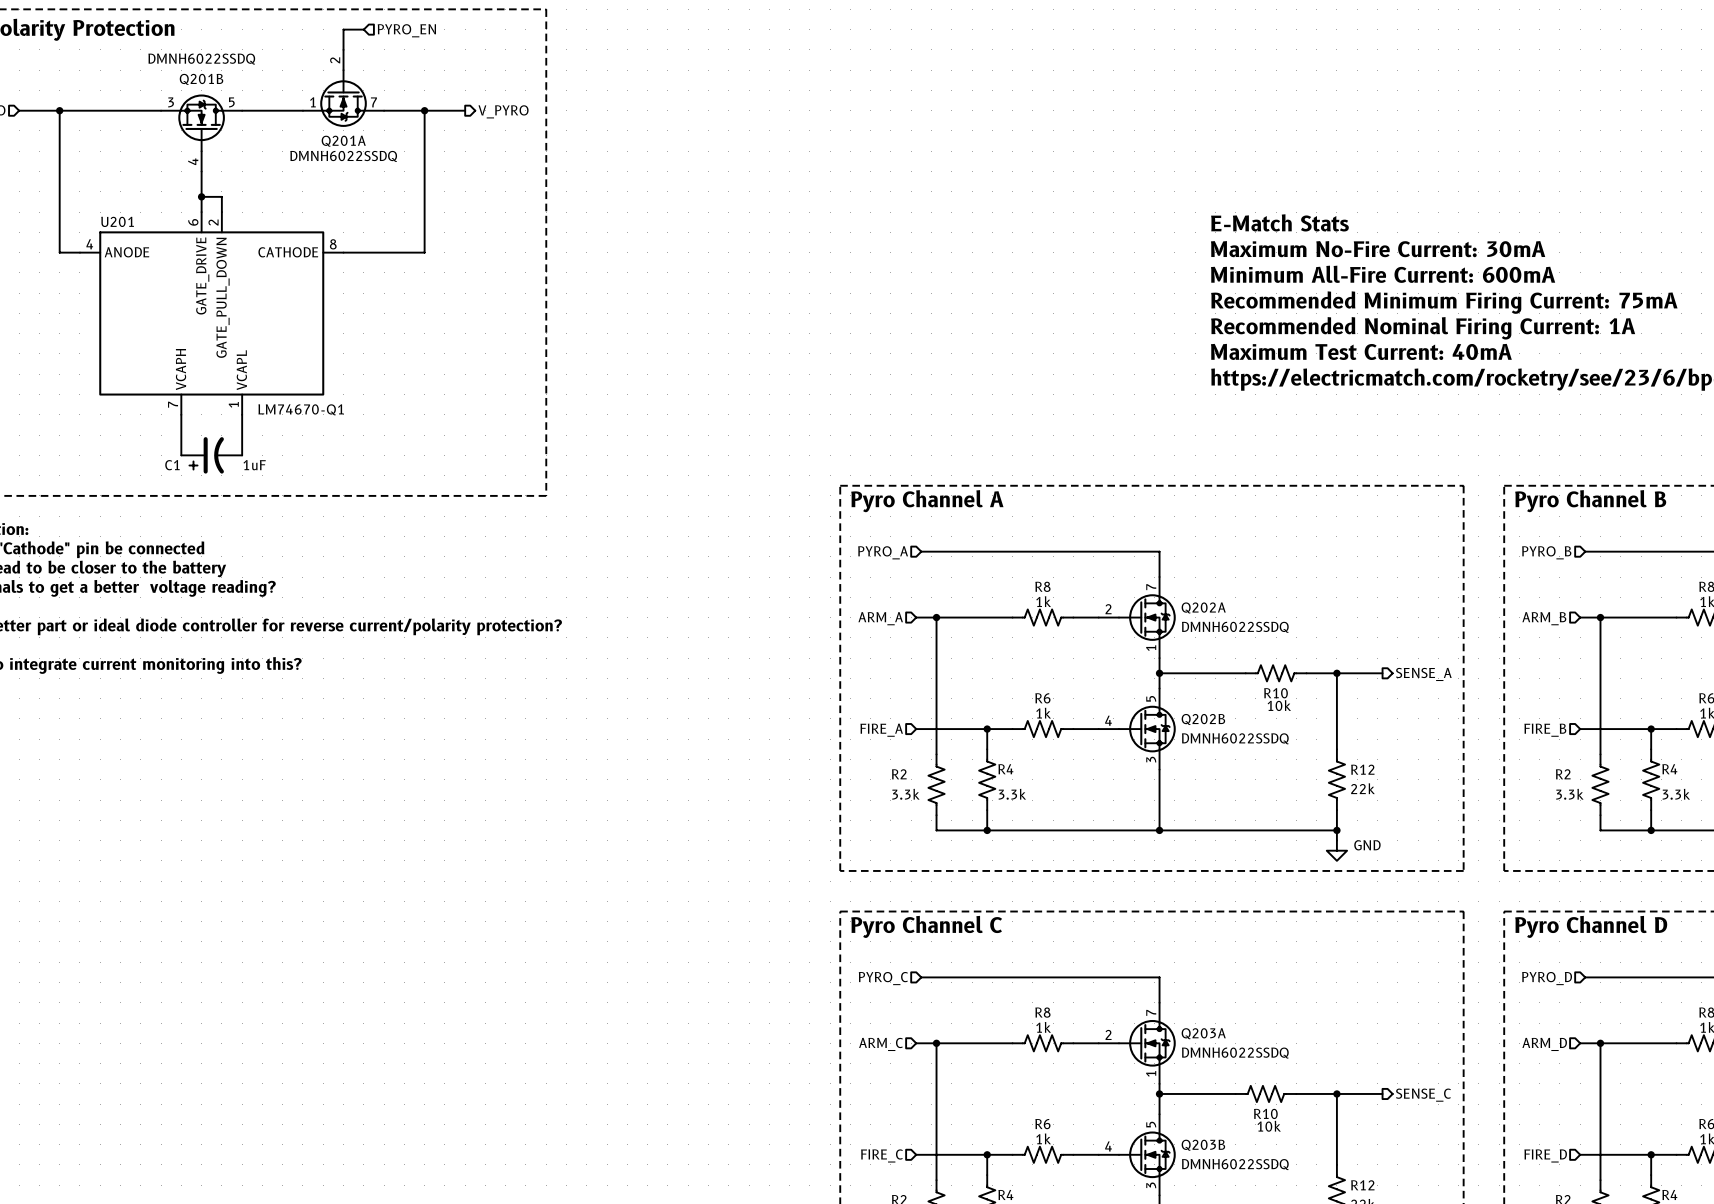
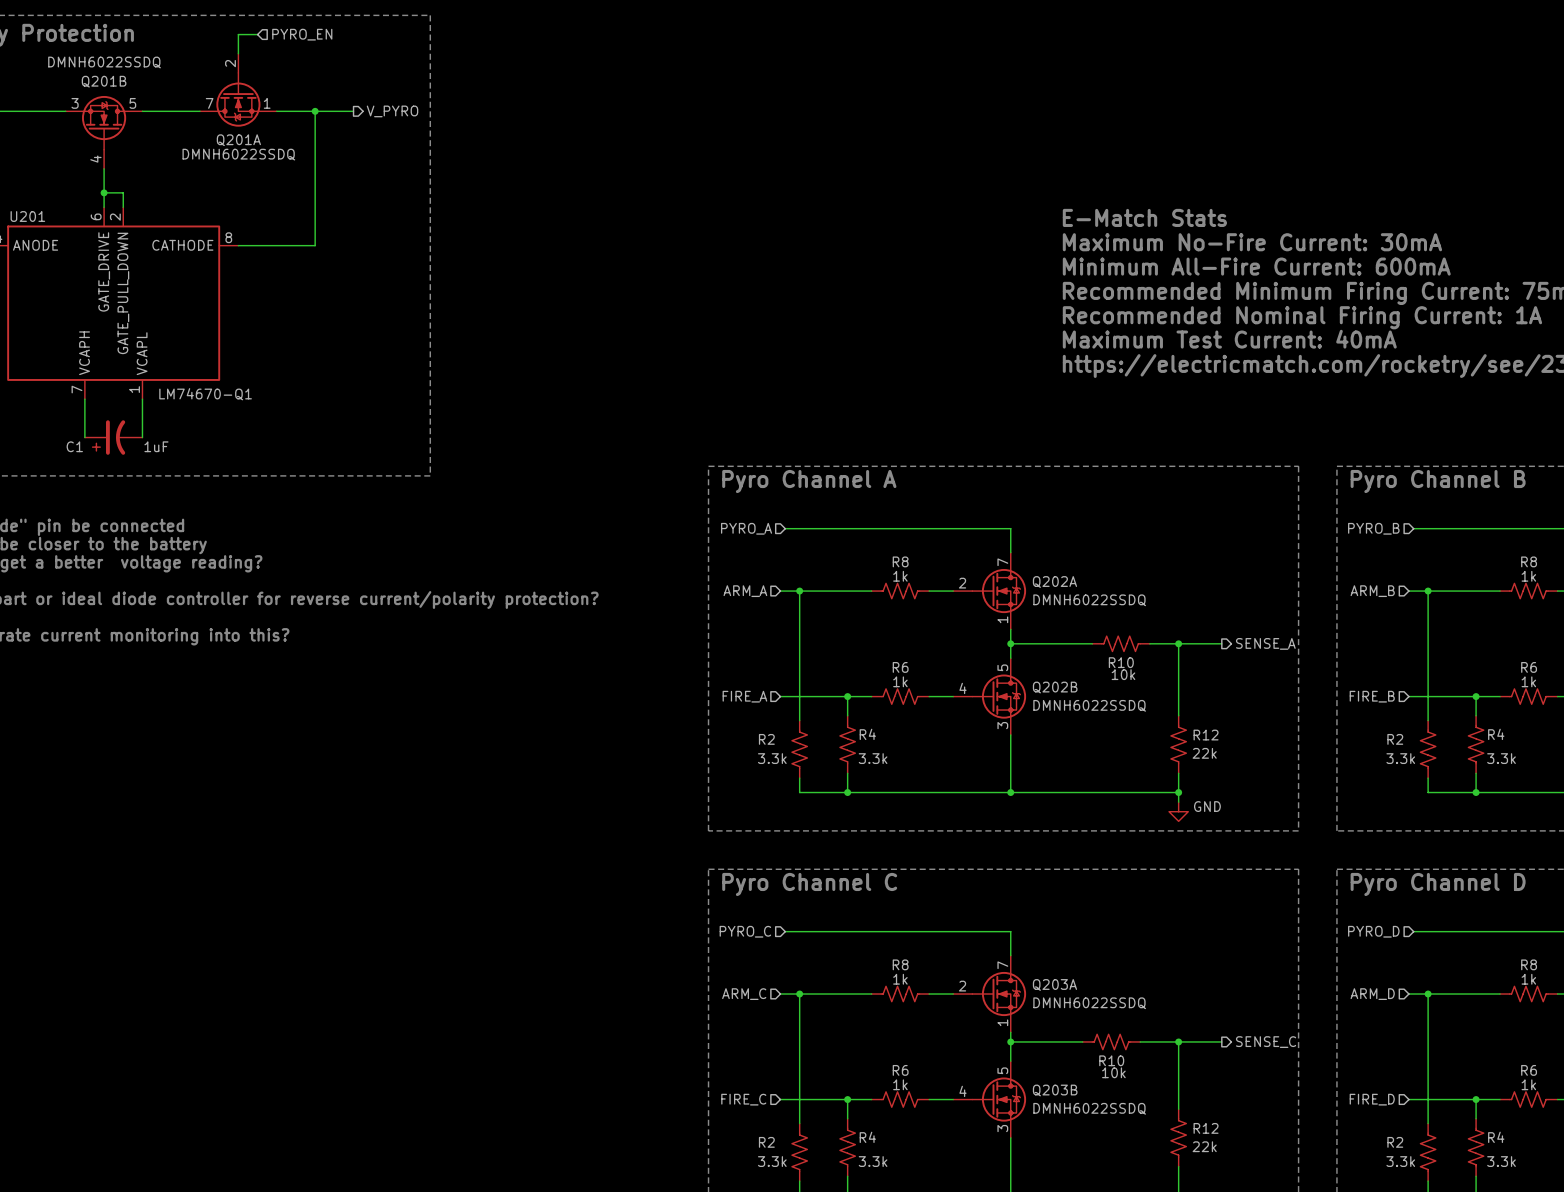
Q201A flip: as is (343, 98) -> left-right (238, 99)

